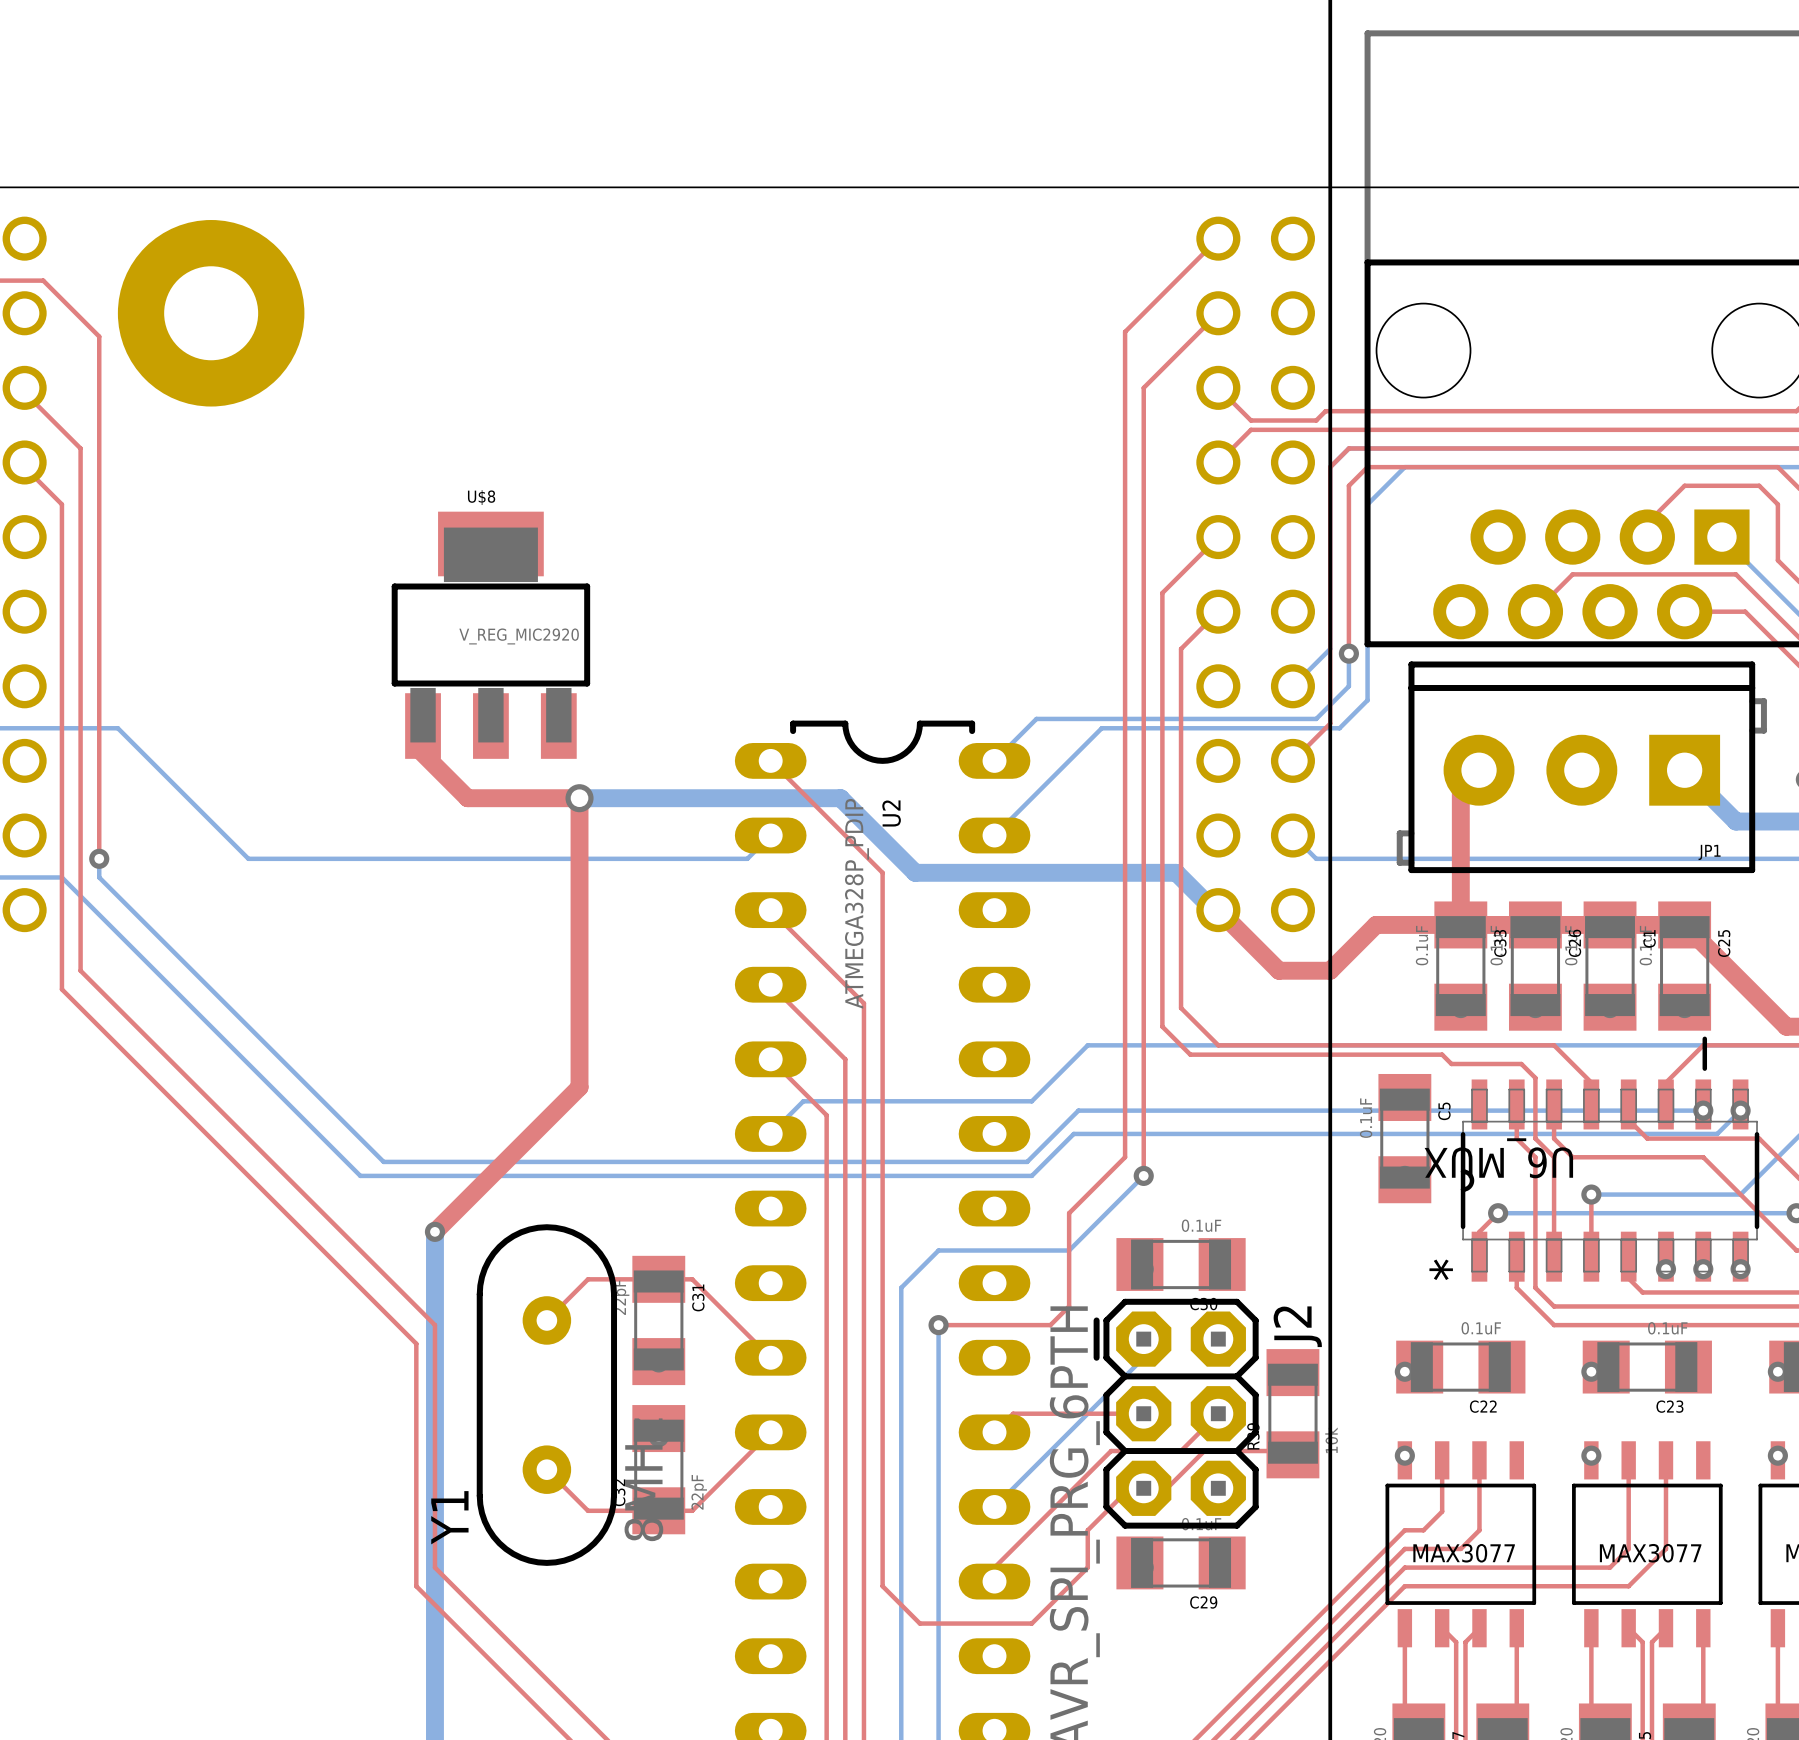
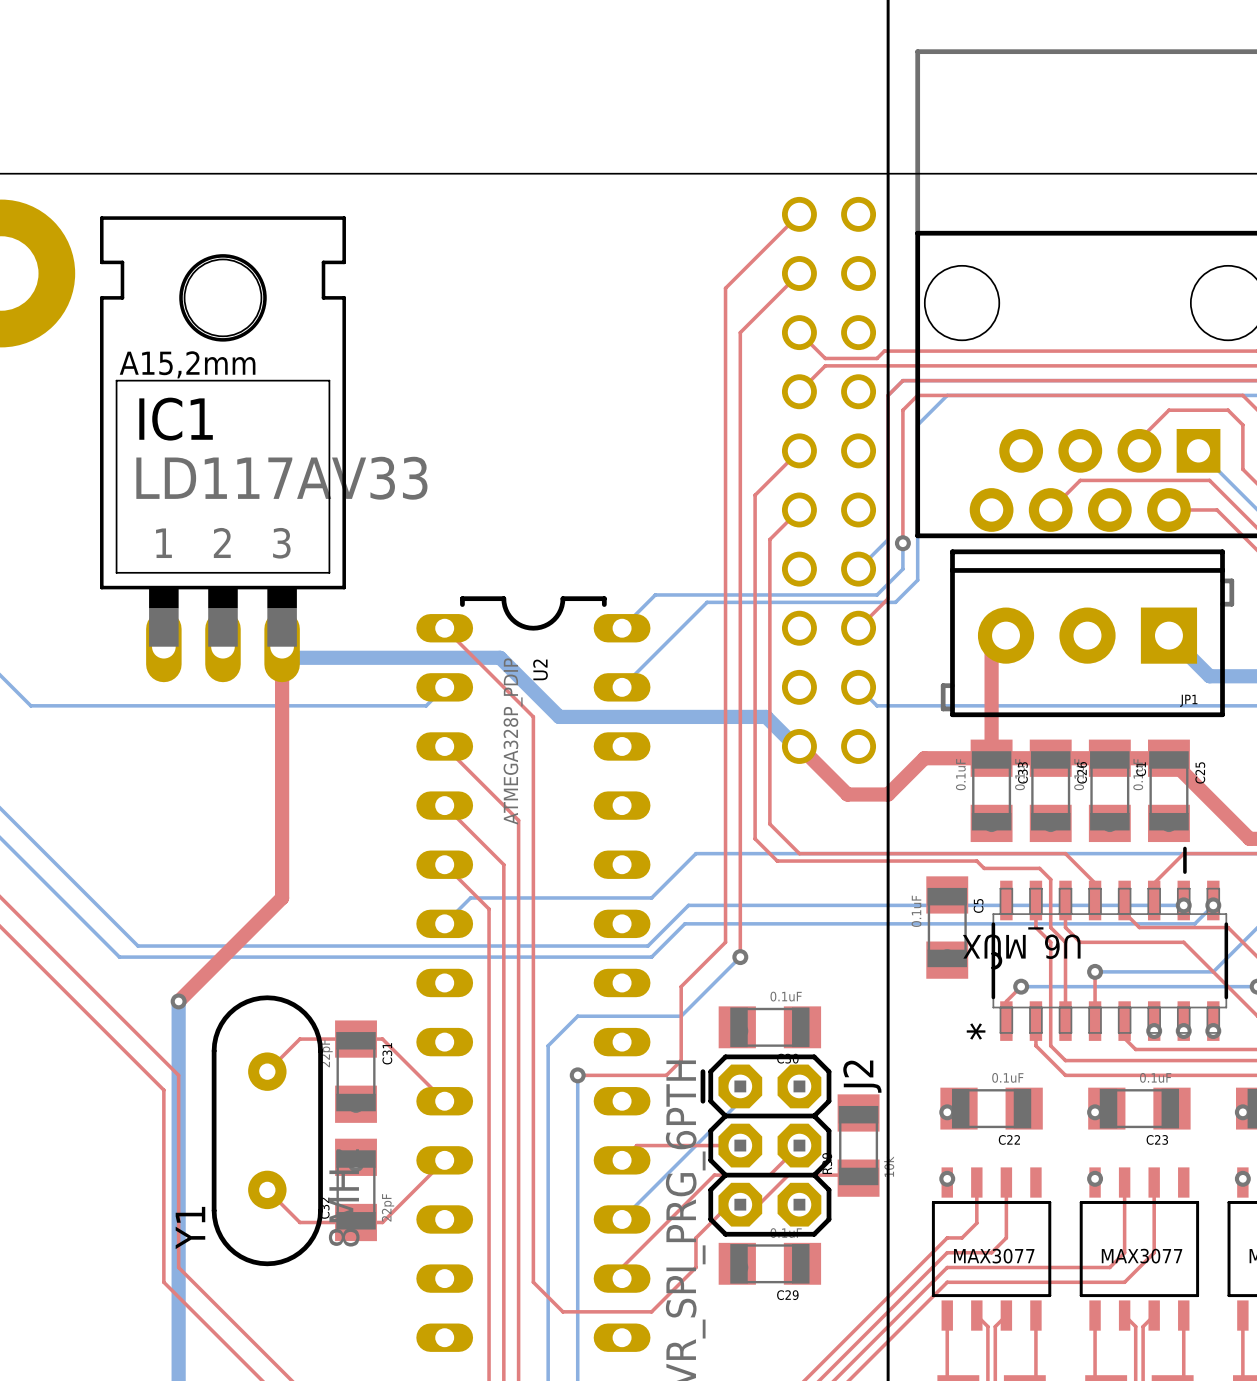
IC1: none -> LD117AV33 (222, 449)
U$8: V_REG_MIC2920 (490, 635) -> none
top track: (423, 726) (416, 746) (467, 798) (579, 798) (579, 1087) (565, 1101) -> (282, 646) (282, 897)
via: (579, 798) -> none

